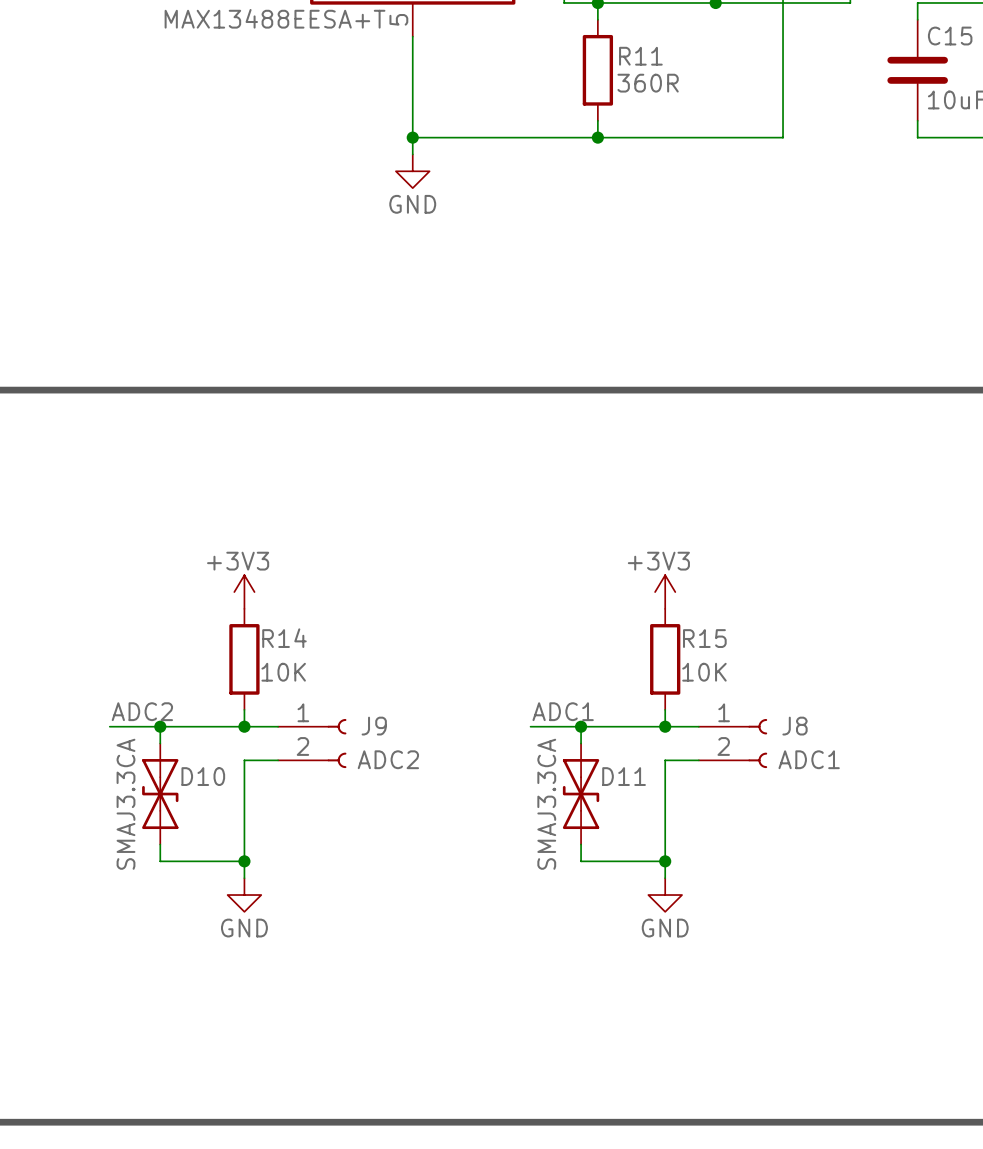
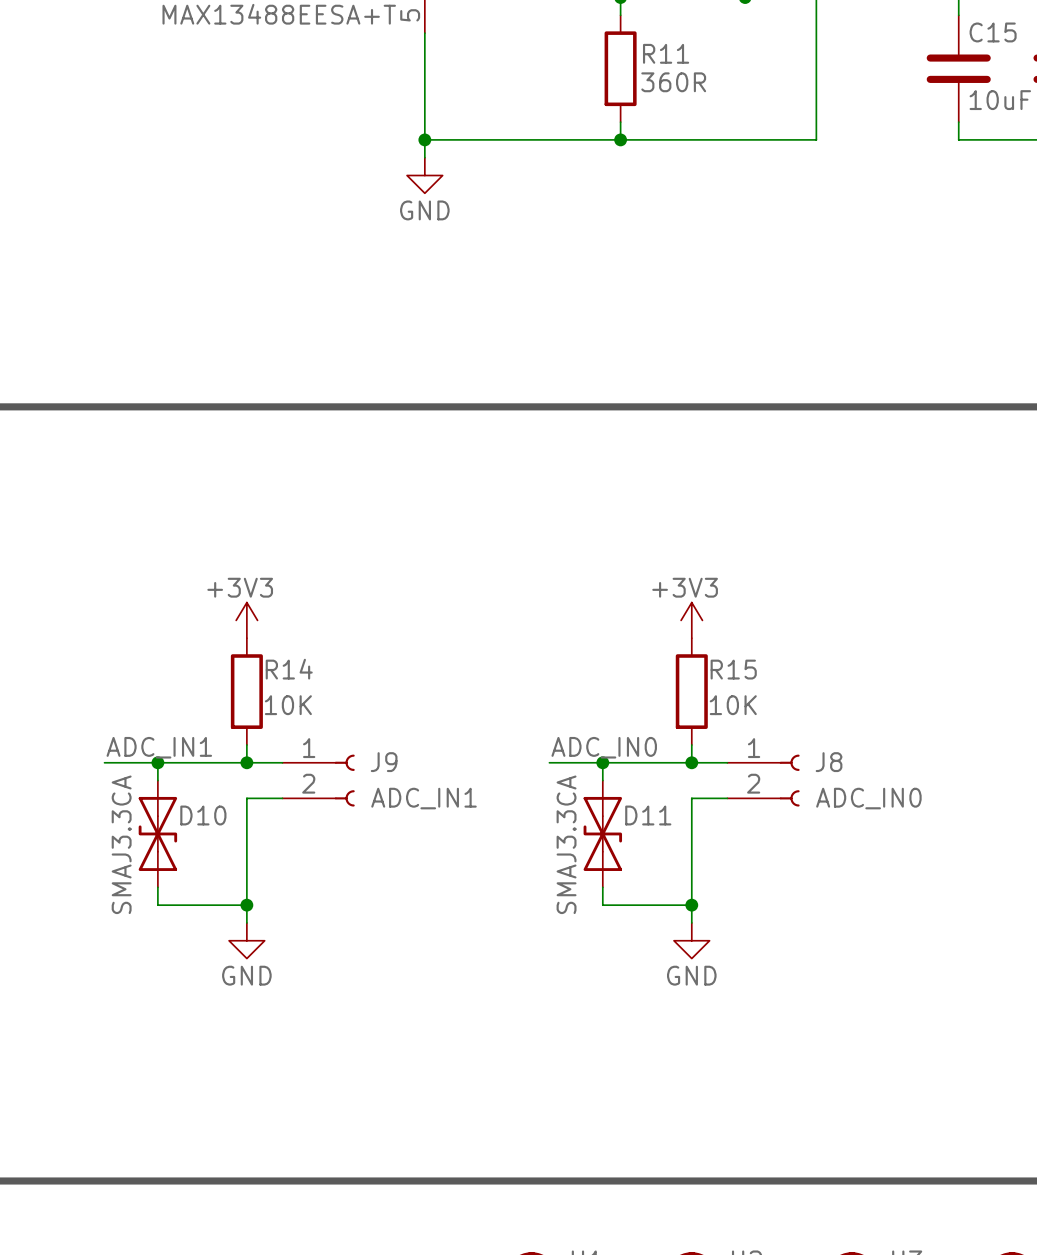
label: ADC2 (142, 711) -> ADC_IN1 (159, 747)
label: ADC1 (563, 711) -> ADC_IN0 (604, 747)
J9 text: ADC2 (388, 759) -> ADC_IN1 (423, 798)
J8 text: ADC1 (809, 759) -> ADC_IN0 (868, 798)

